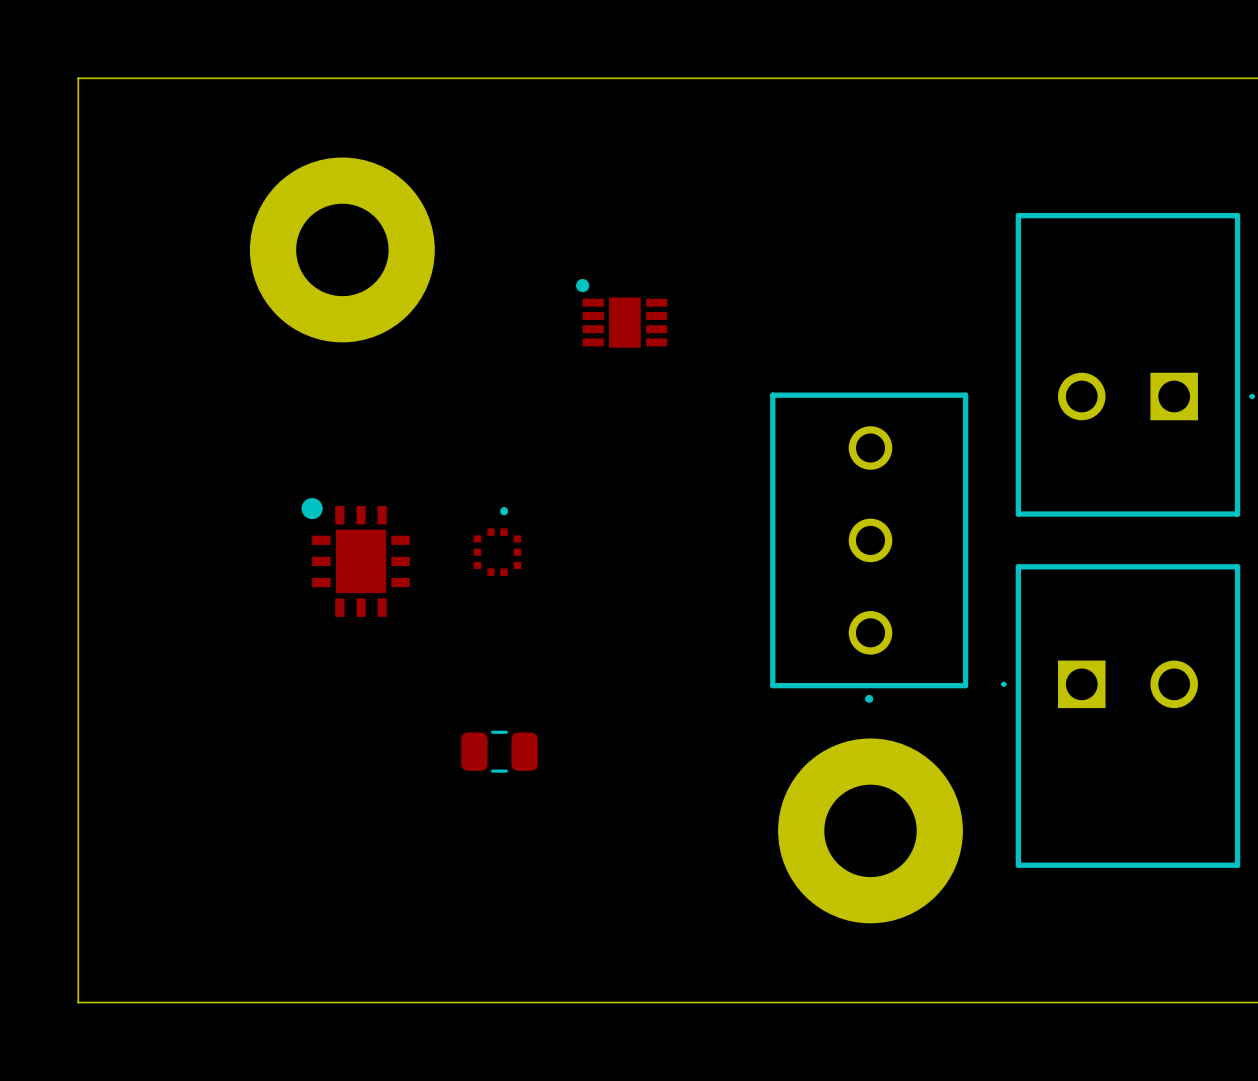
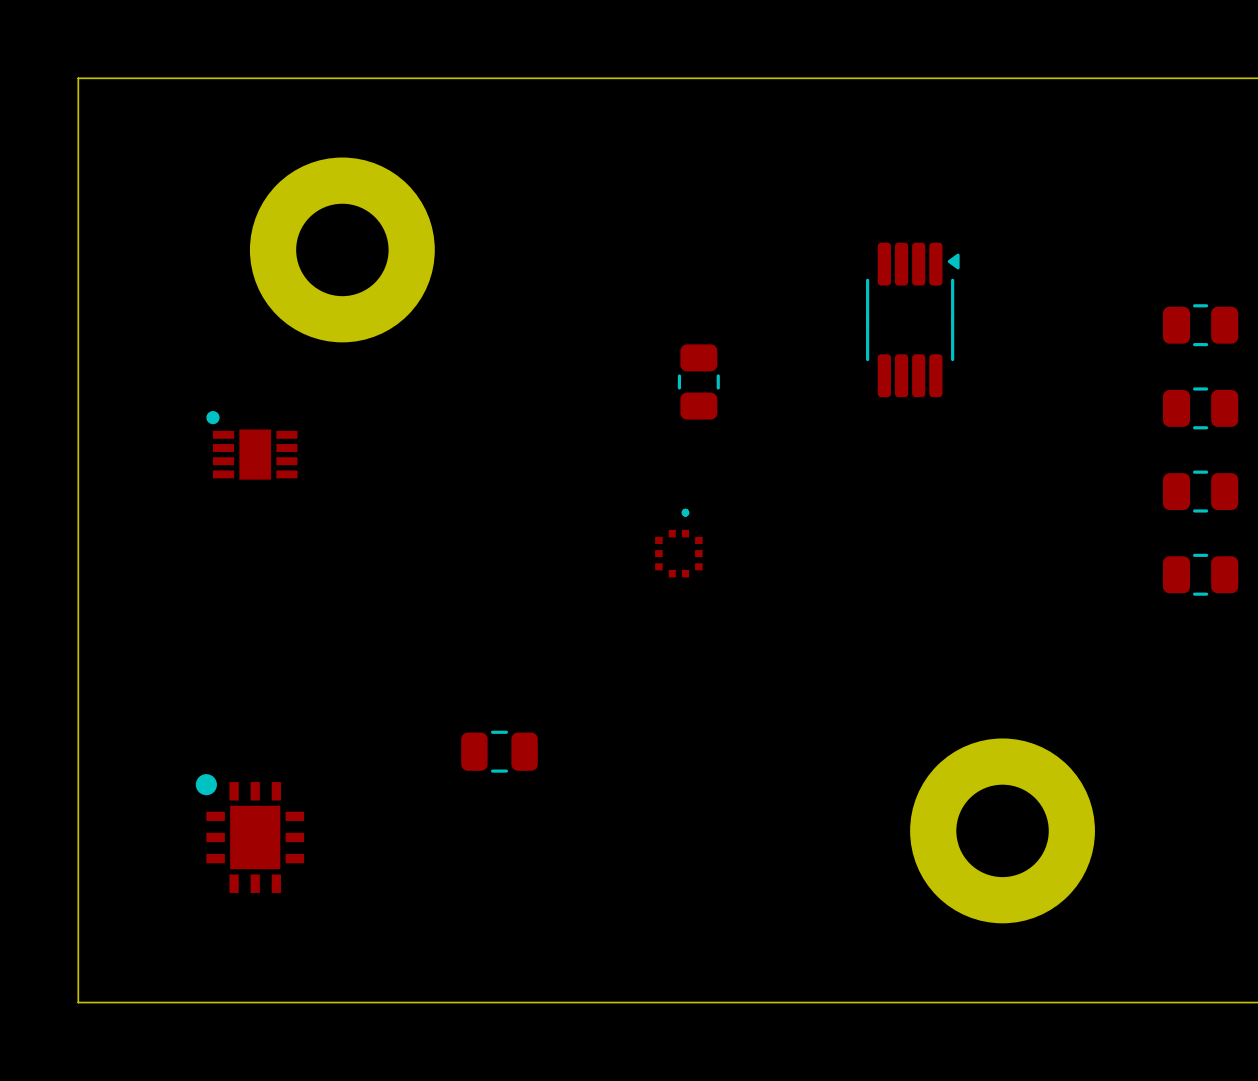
part position: (621, 313) -> (251, 445)
part: none -> (912, 319)
part: none -> (1200, 325)
part: (1135, 364) -> none
part: none -> (698, 381)
part: none -> (1200, 408)
part: none -> (1200, 491)
part position: (497, 541) -> (678, 543)
part: (869, 547) -> none
part position: (355, 557) -> (249, 833)
part: none -> (1200, 574)
part: (1120, 716) -> none
part position: (870, 830) -> (1002, 830)

